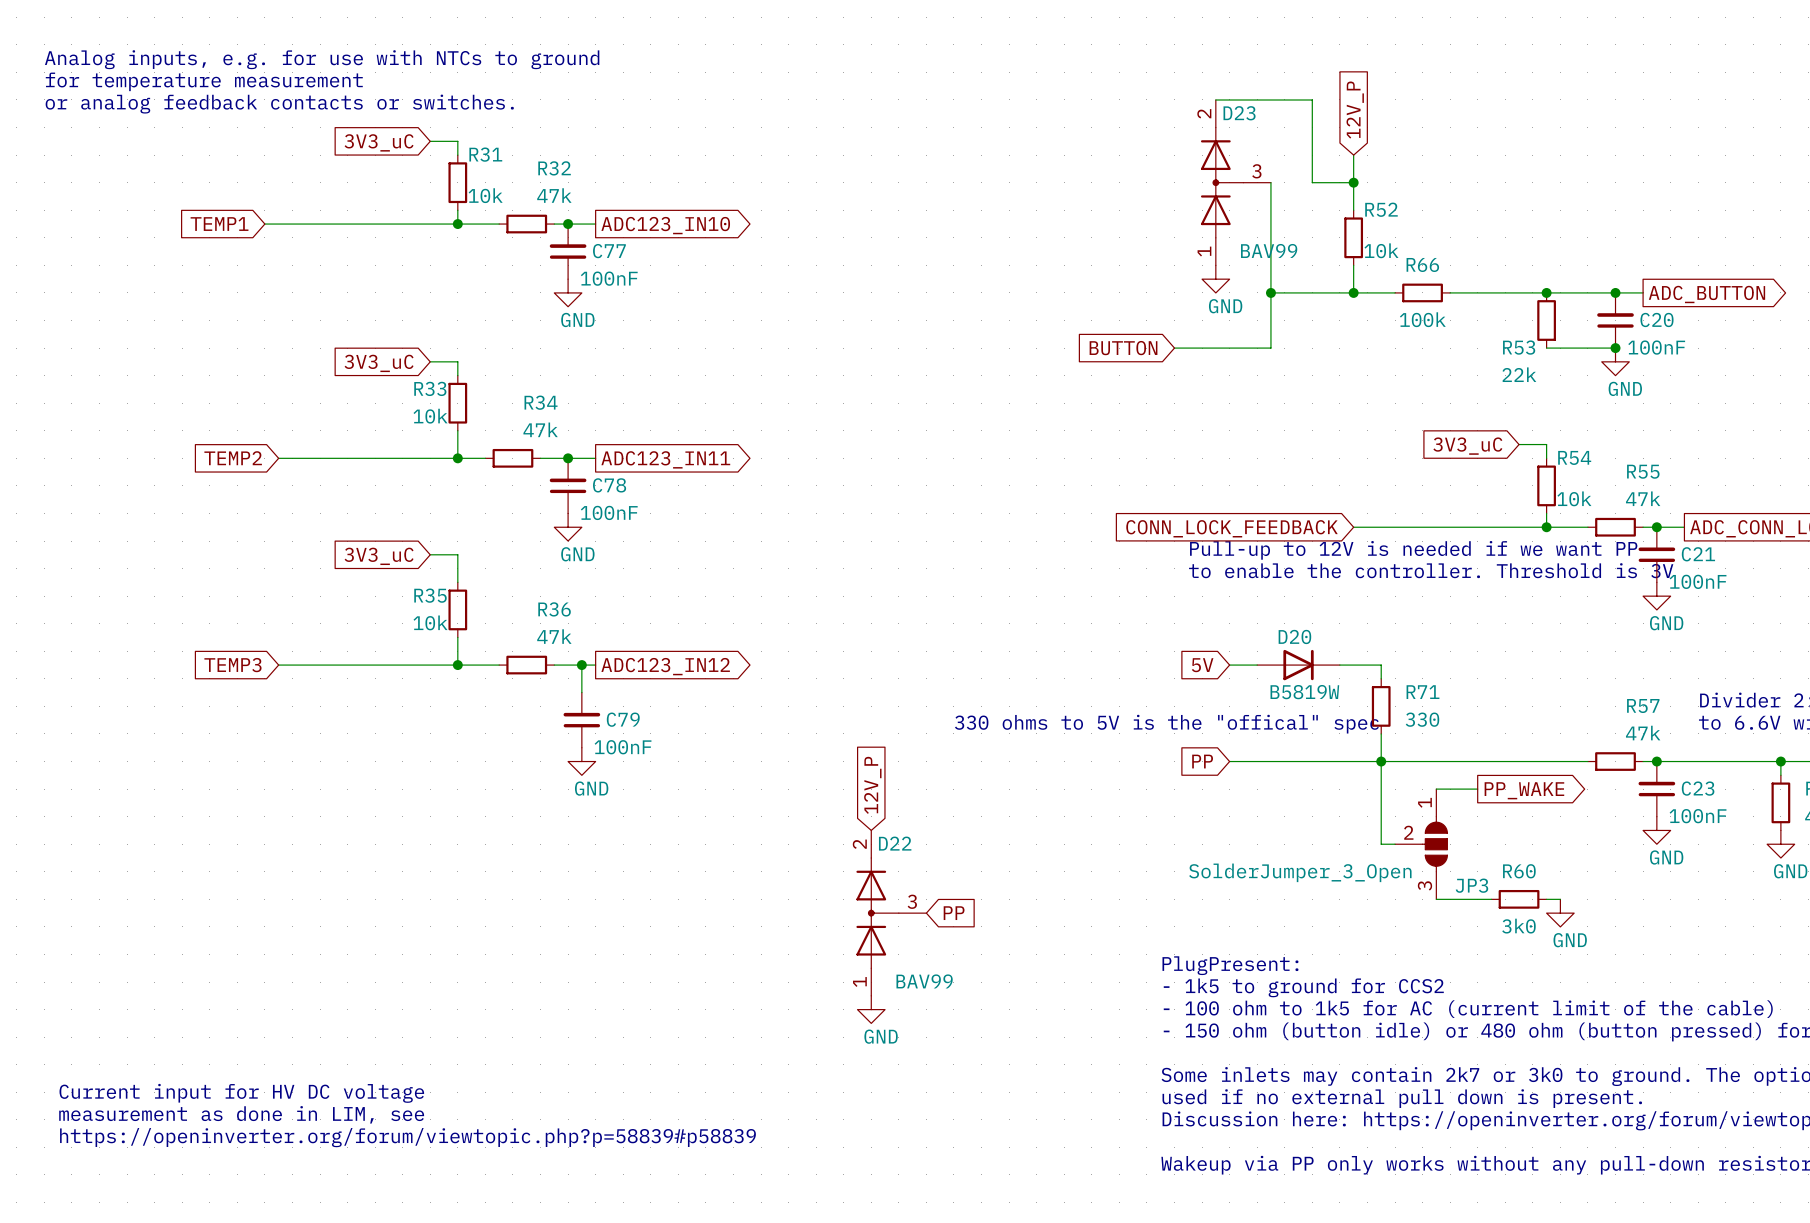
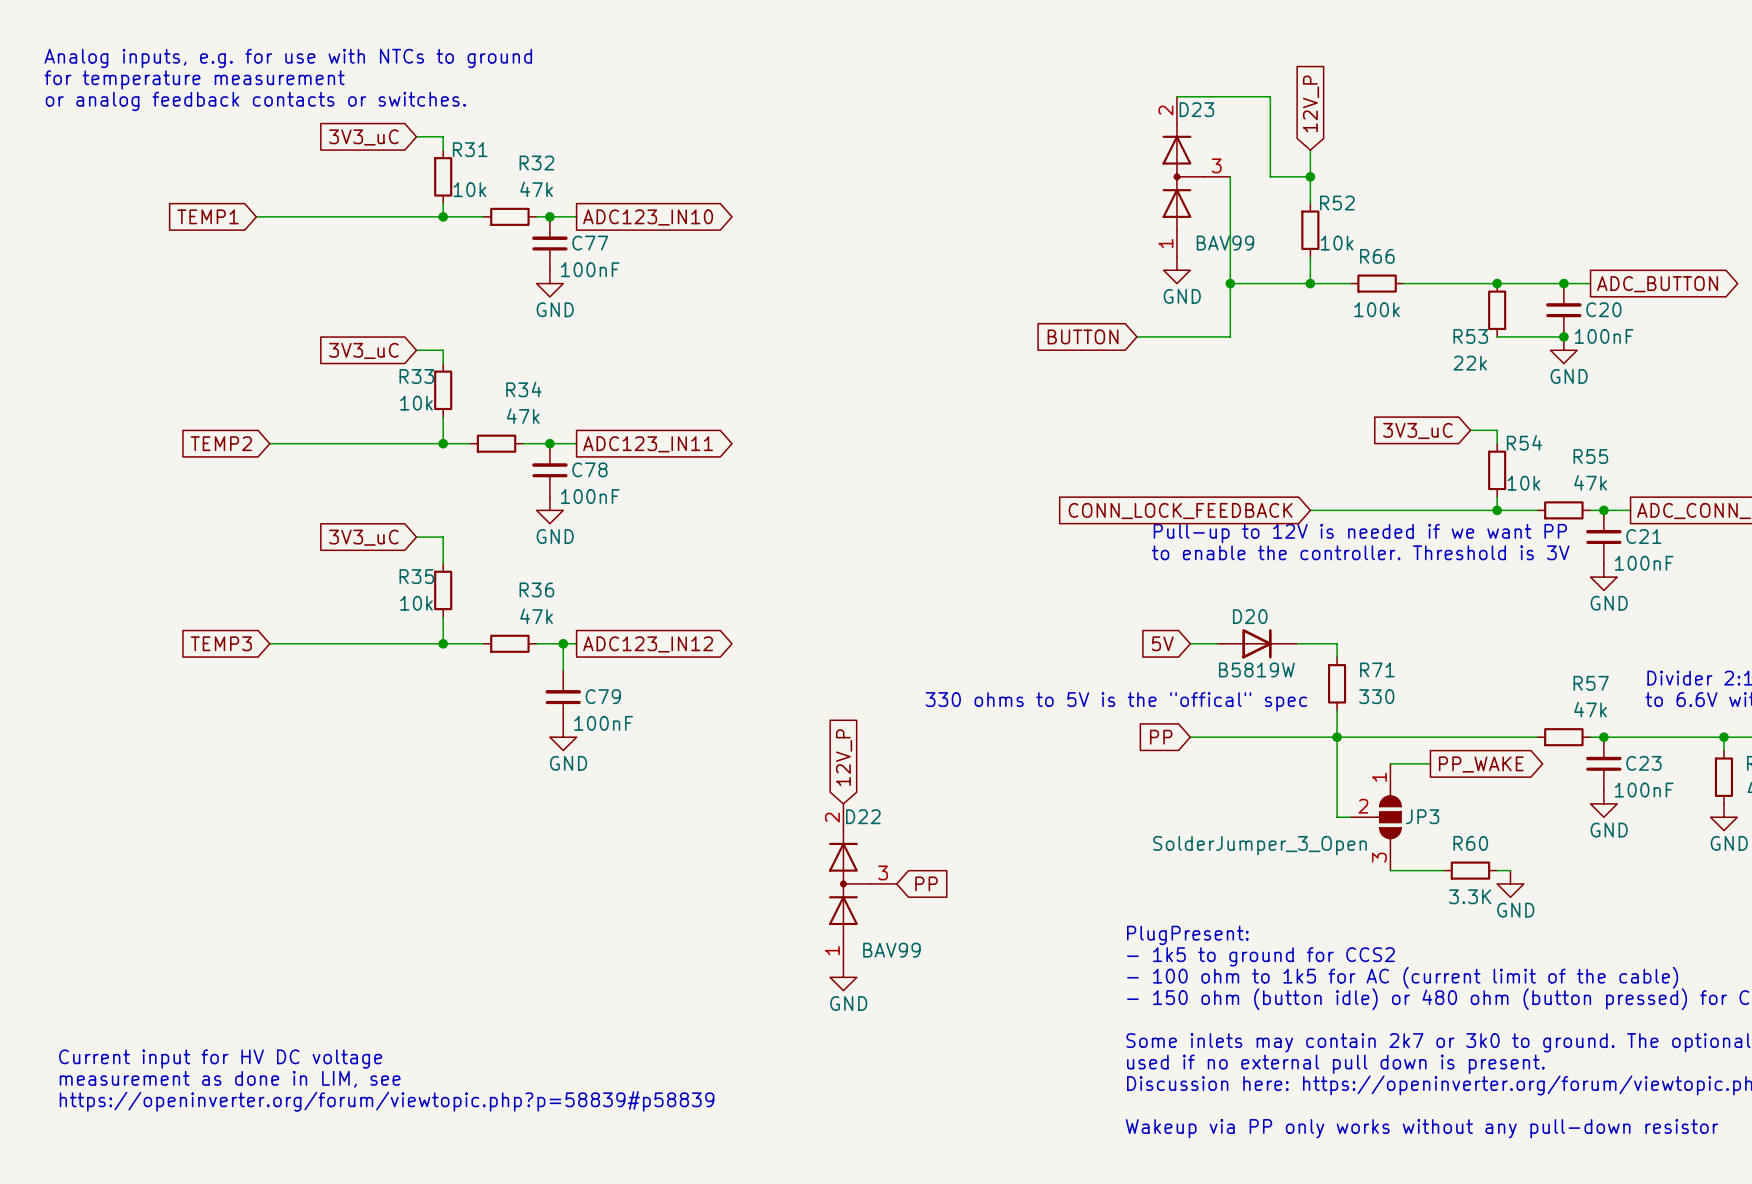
JP3 name position: JP3 (1471, 885) -> JP3 (1422, 816)
R60 value: 3k0 (1518, 926) -> 3.3K (1470, 896)

